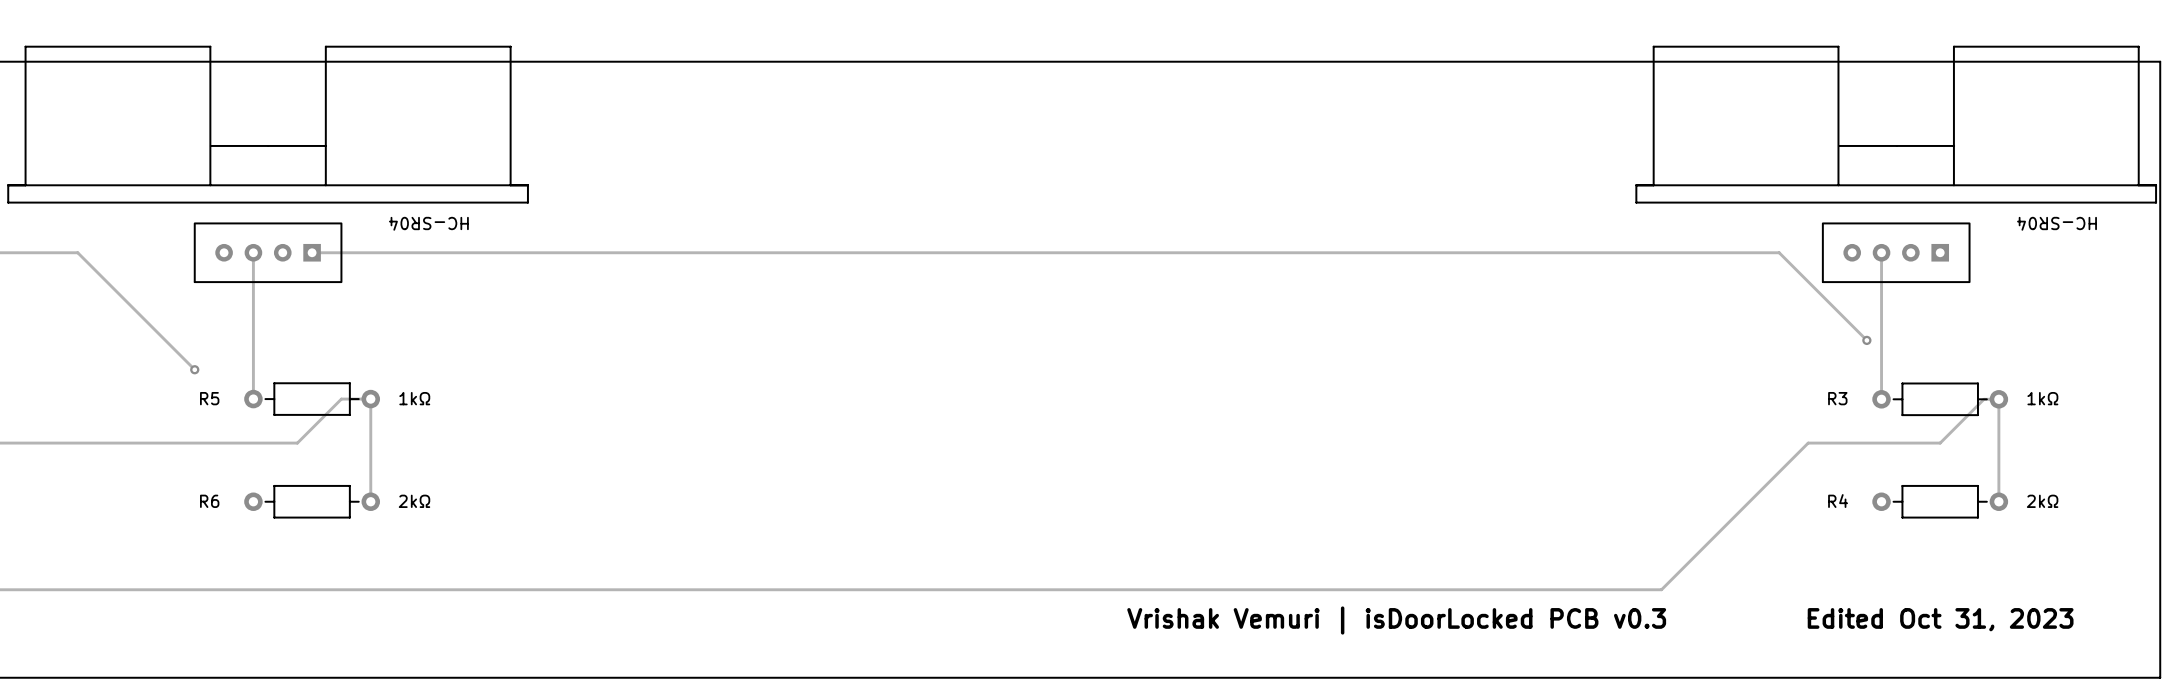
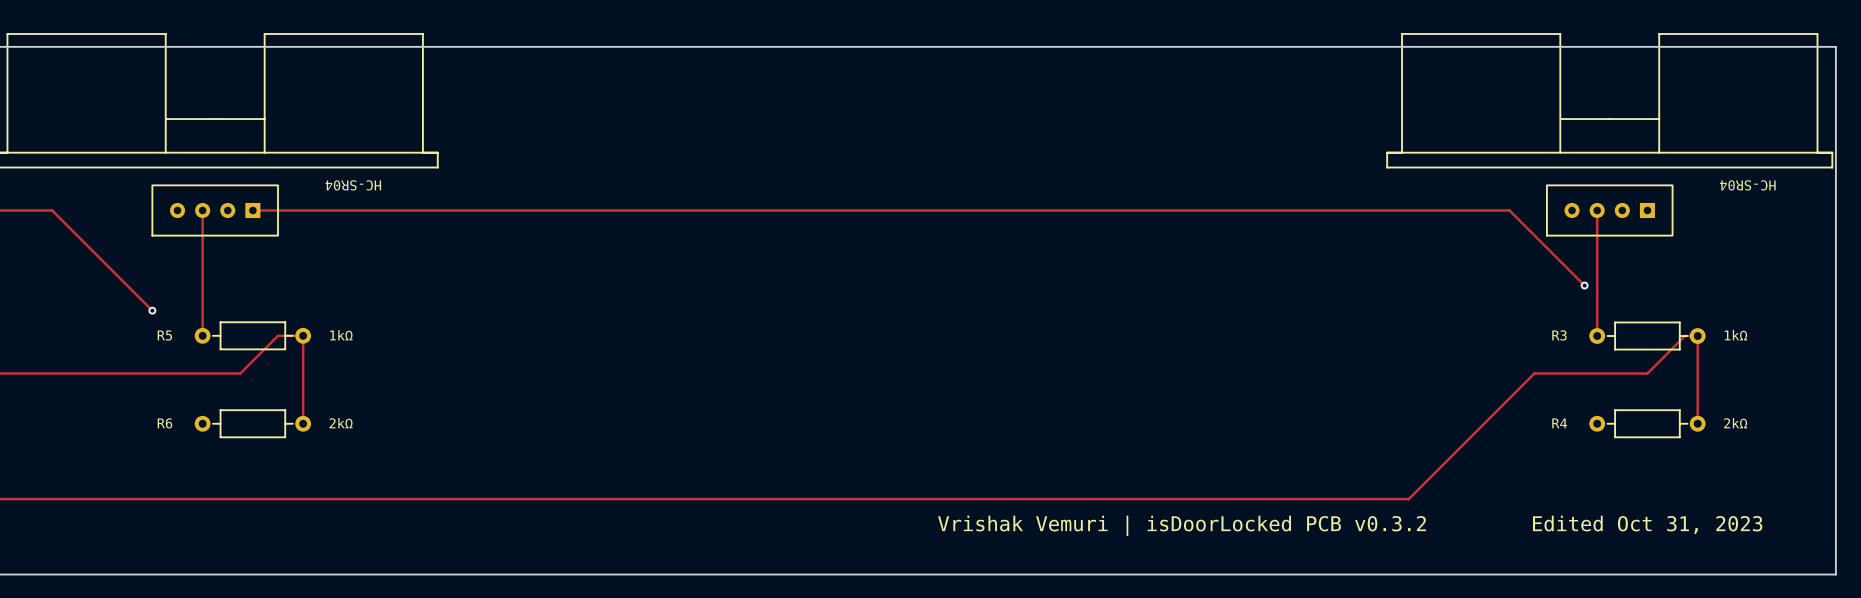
text: Vrishak Vemuri | isDoorLocked PCB v0.3 (1396, 620) -> Vrishak Vemuri | isDoorLocked PCB v0.3.2 (1182, 525)

